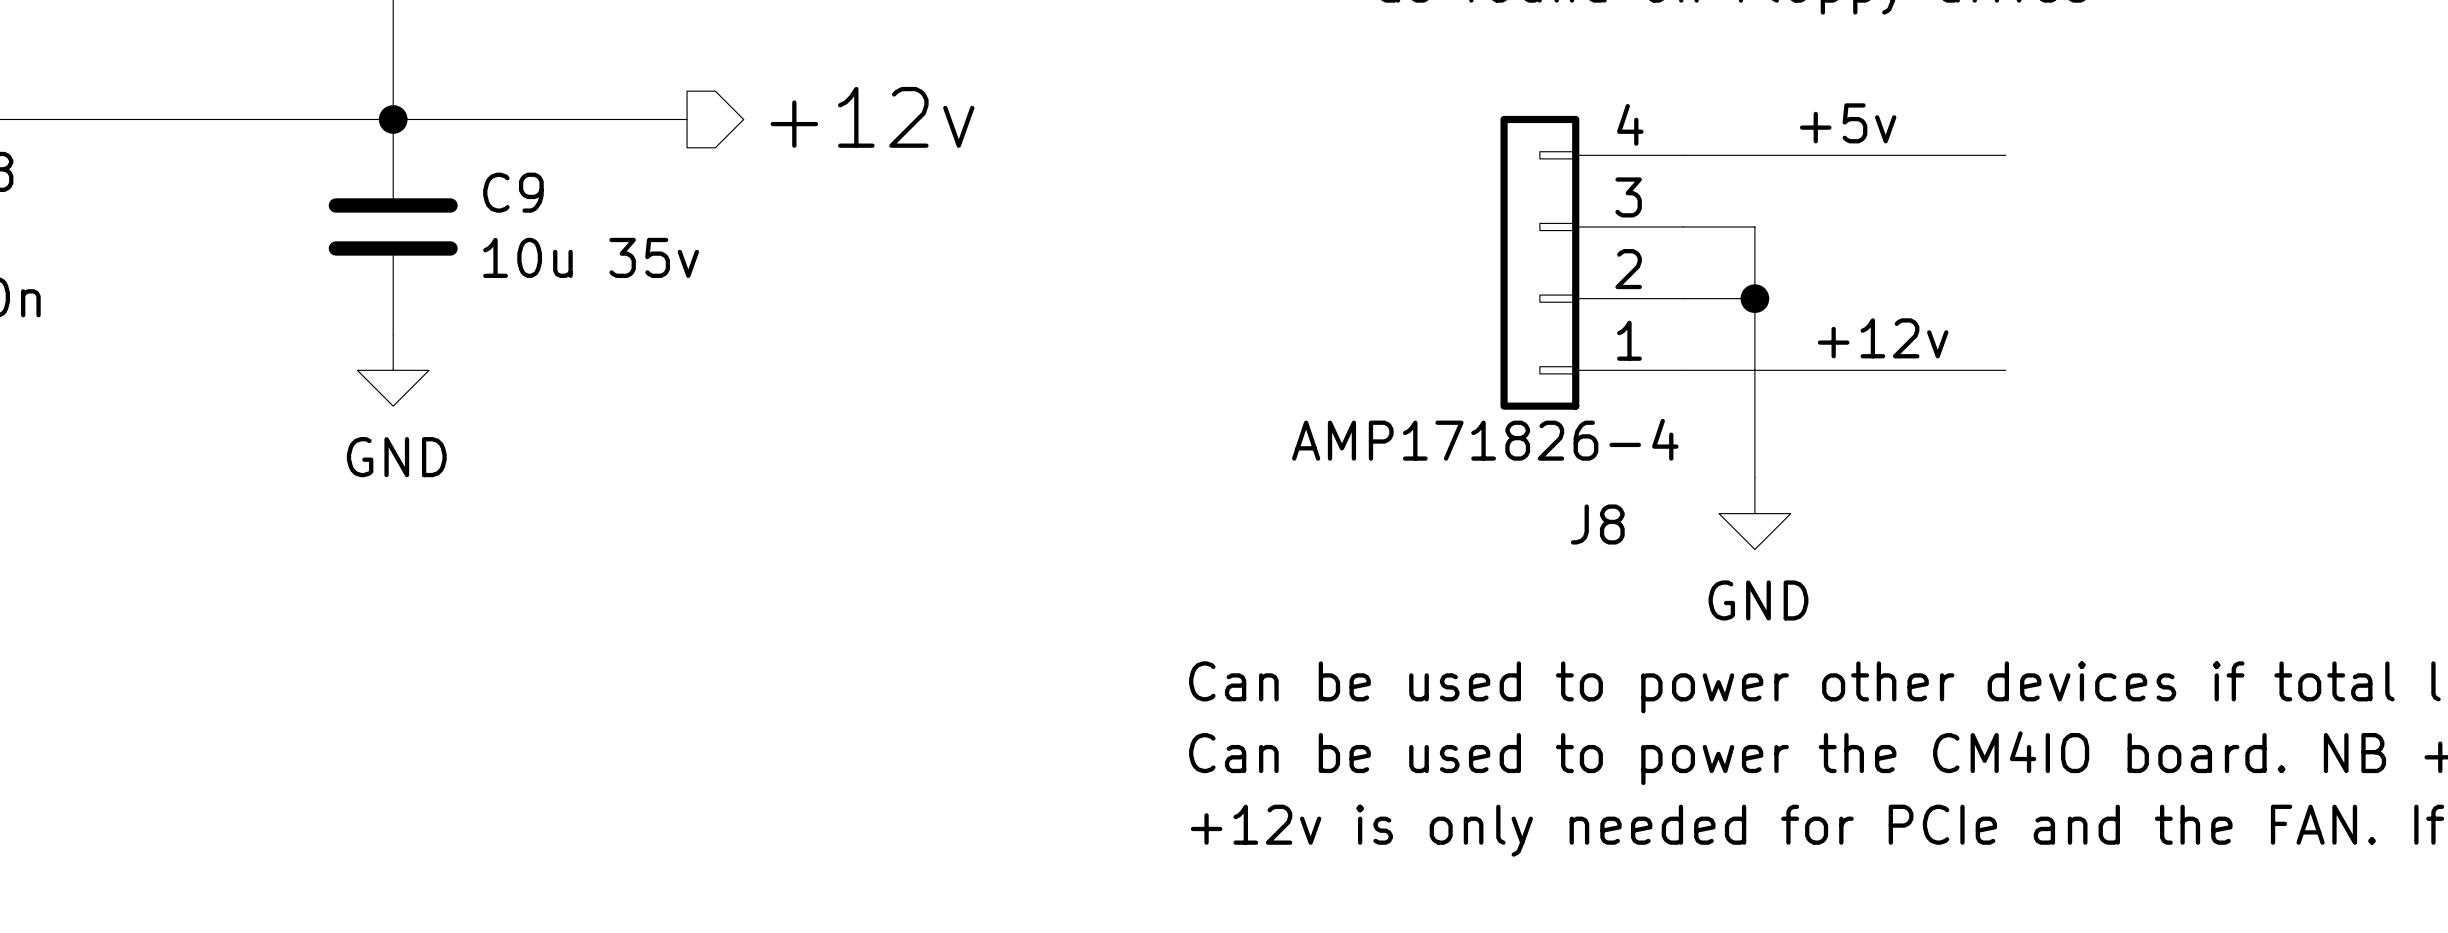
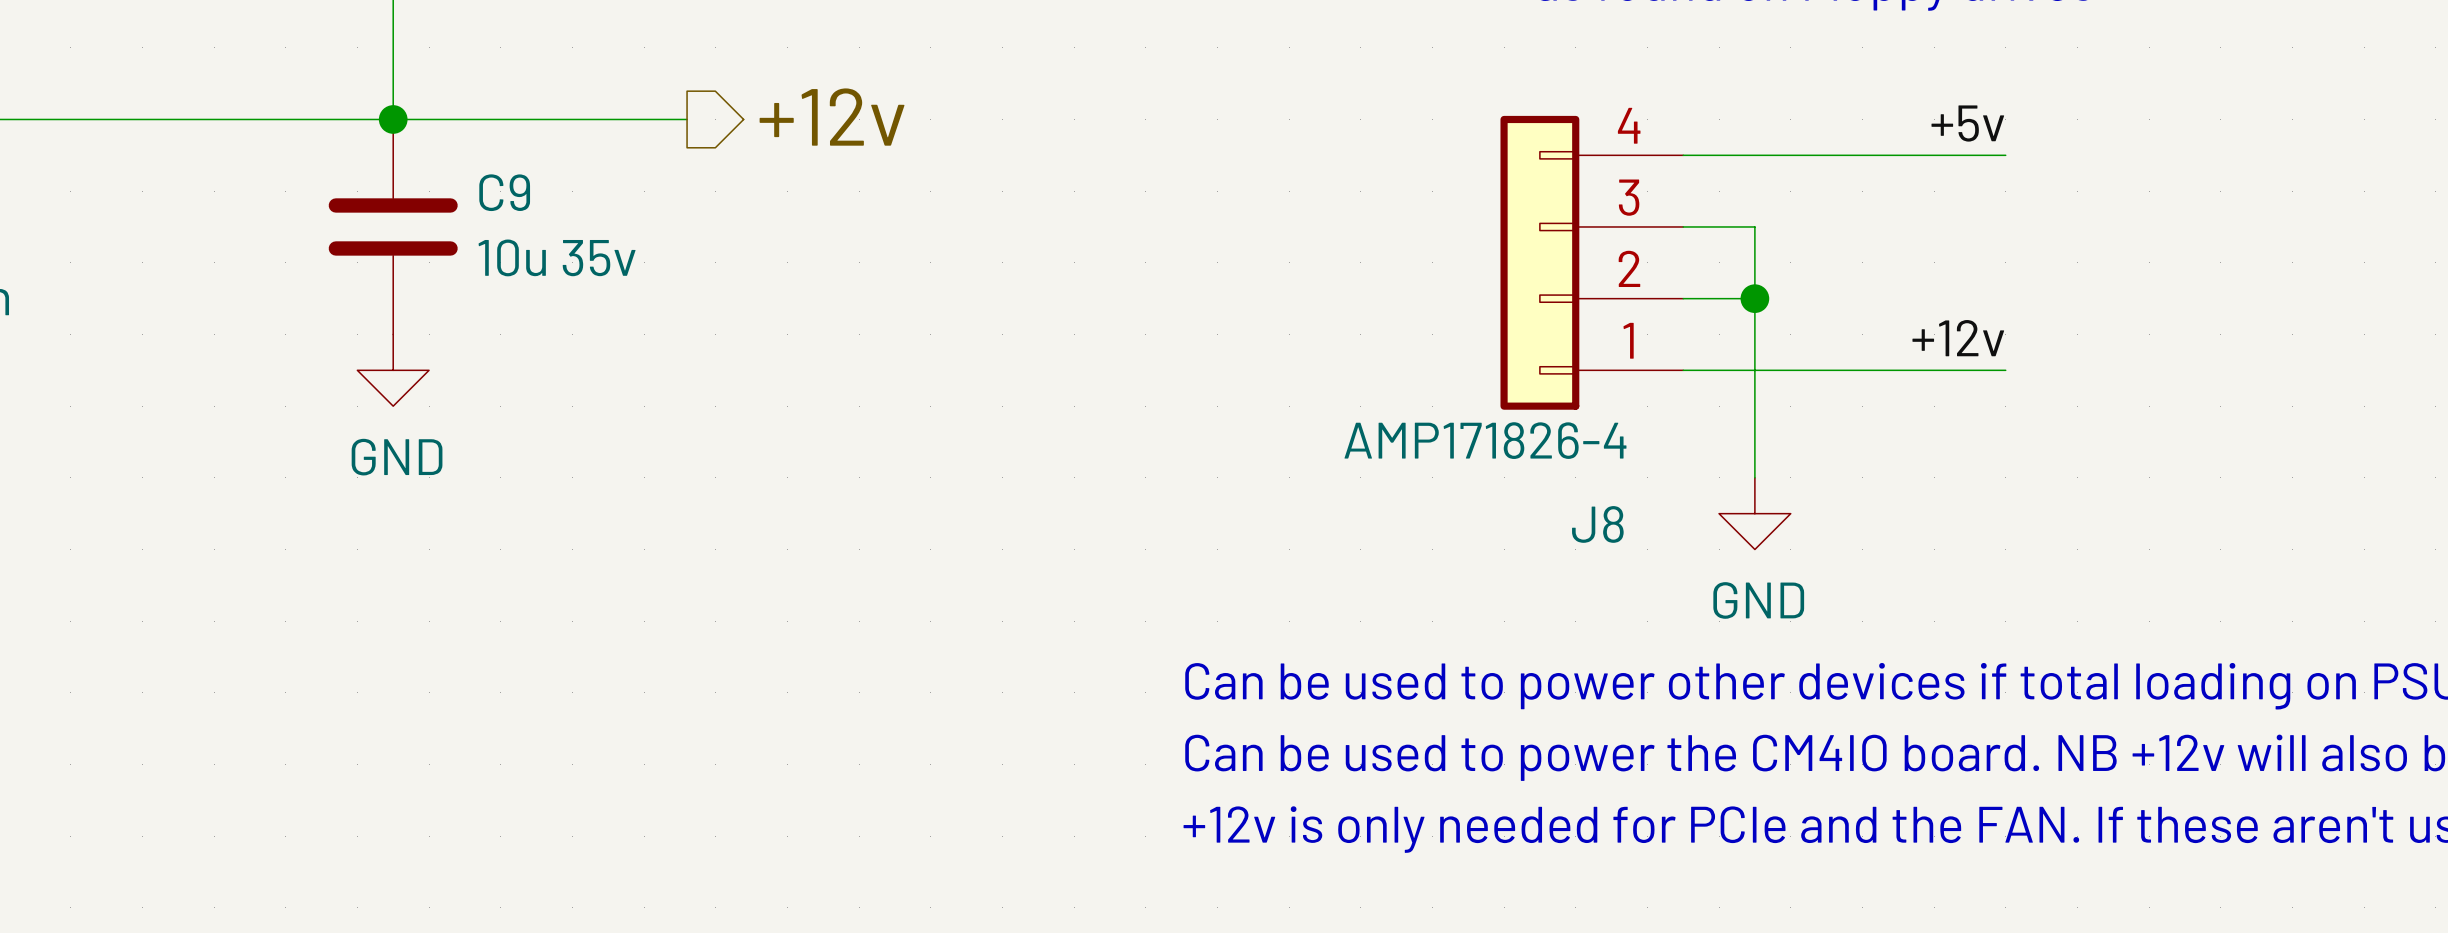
label position: +5v (1848, 123) -> +5v (1967, 123)
label position: +12v (1883, 338) -> +12v (1958, 338)

